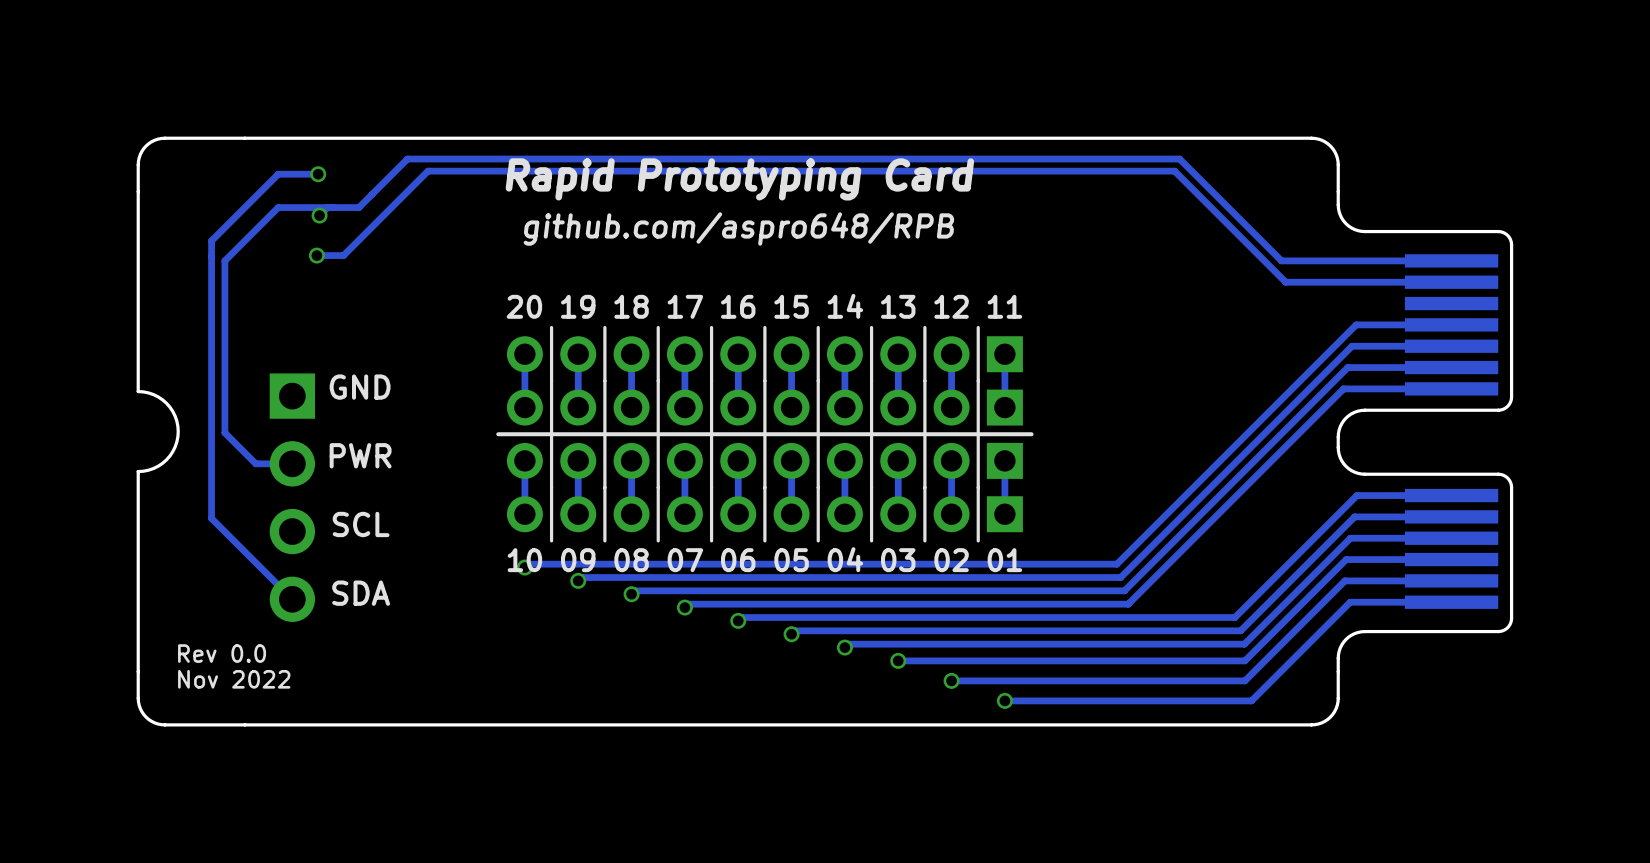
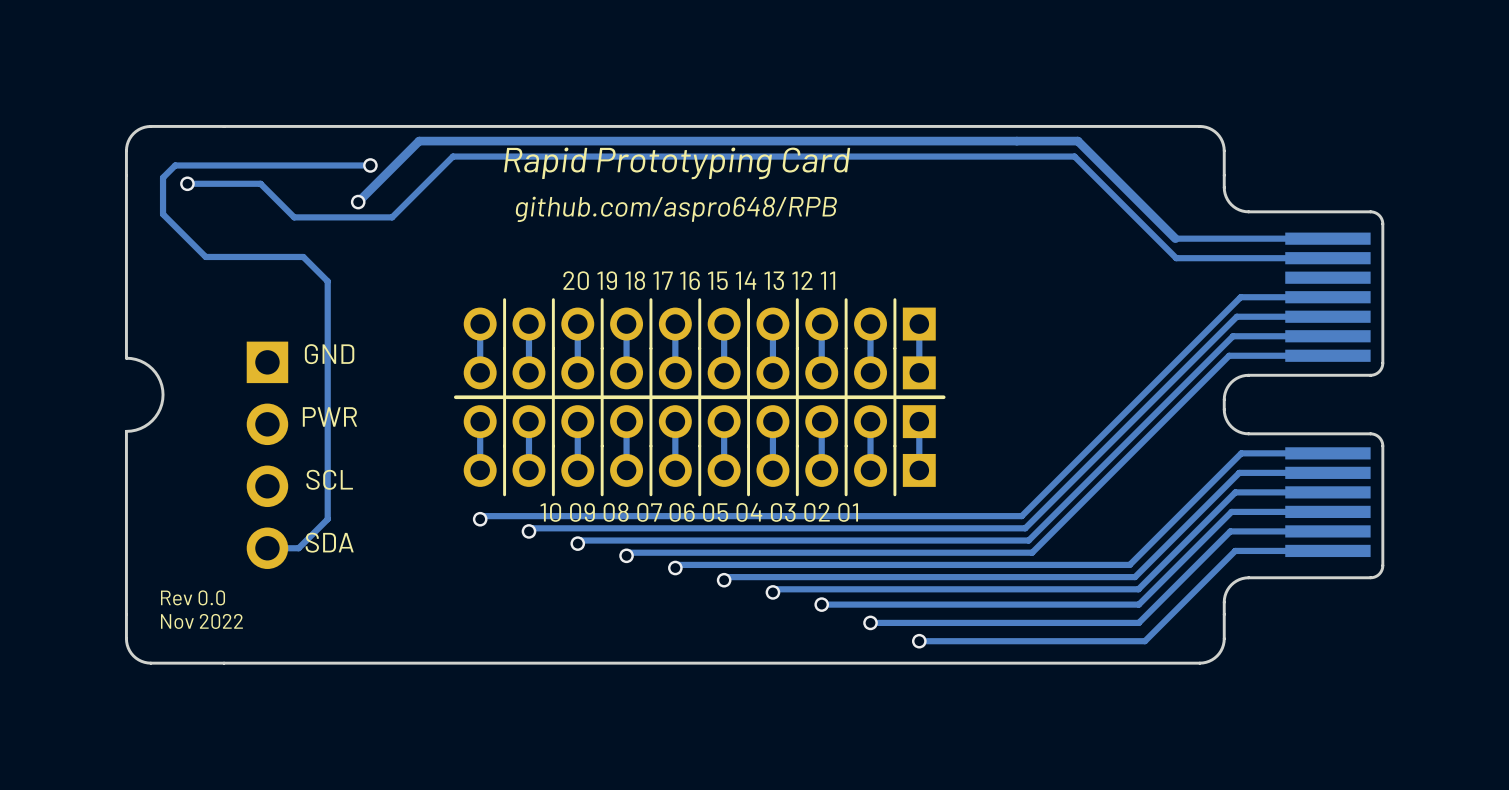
track: (495, 171) (427, 171) (343, 255) (316, 255) -> (452, 156) (392, 217) (294, 217) (260, 183) (187, 183)
track: (318, 174) (278, 174) (211, 240) (211, 518) (292, 599) -> (370, 165) (175, 165) (163, 177) (163, 214) (205, 256) (303, 256) (327, 281) (327, 519) (298, 548) (267, 548)
via: (318, 174) -> none
via: none -> (370, 165)
via: none -> (187, 183)
via: (319, 215) -> none
via: none -> (358, 202)
via: (316, 255) -> none
track: (1284, 260) (1281, 260) (1179, 159) (407, 159) (358, 207) (278, 207) (224, 260) (224, 432) (255, 463) (292, 463) -> (1175, 238) (1077, 141) (419, 141) (358, 202)

